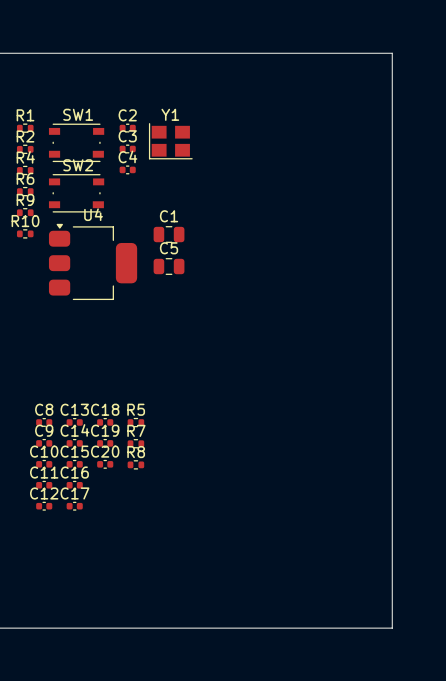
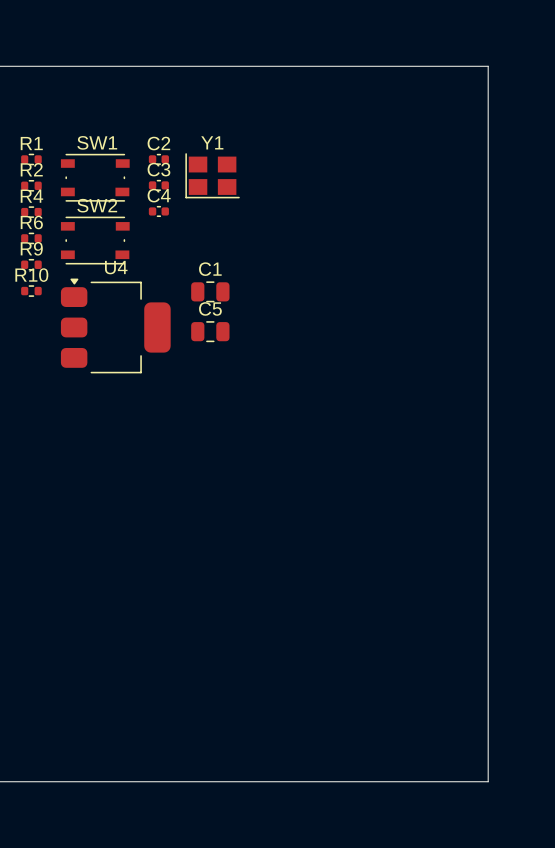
C8: (44, 422) -> none
C13: (74, 422) -> none
C18: (105, 422) -> none
R5: (135, 422) -> none
C9: (44, 443) -> none
C14: (74, 443) -> none
C19: (105, 443) -> none
R7: (135, 443) -> none
C10: (44, 464) -> none
C15: (74, 464) -> none
C20: (105, 464) -> none
R8: (135, 464) -> none
C11: (44, 485) -> none
C16: (74, 485) -> none
C12: (44, 506) -> none
C17: (74, 506) -> none

